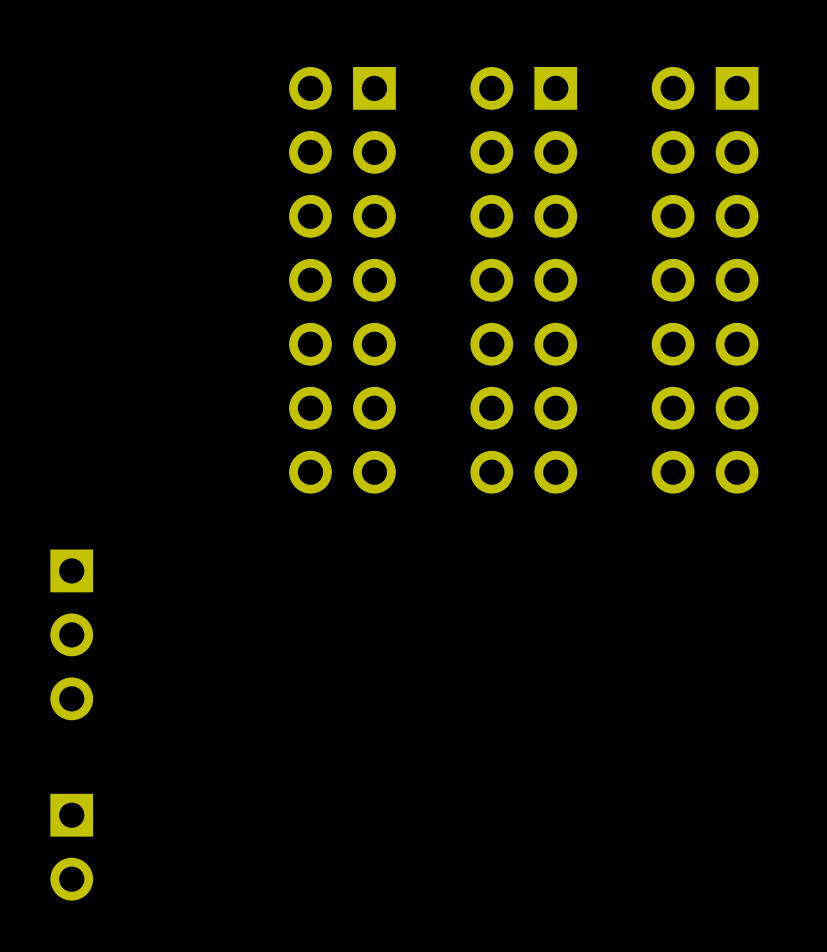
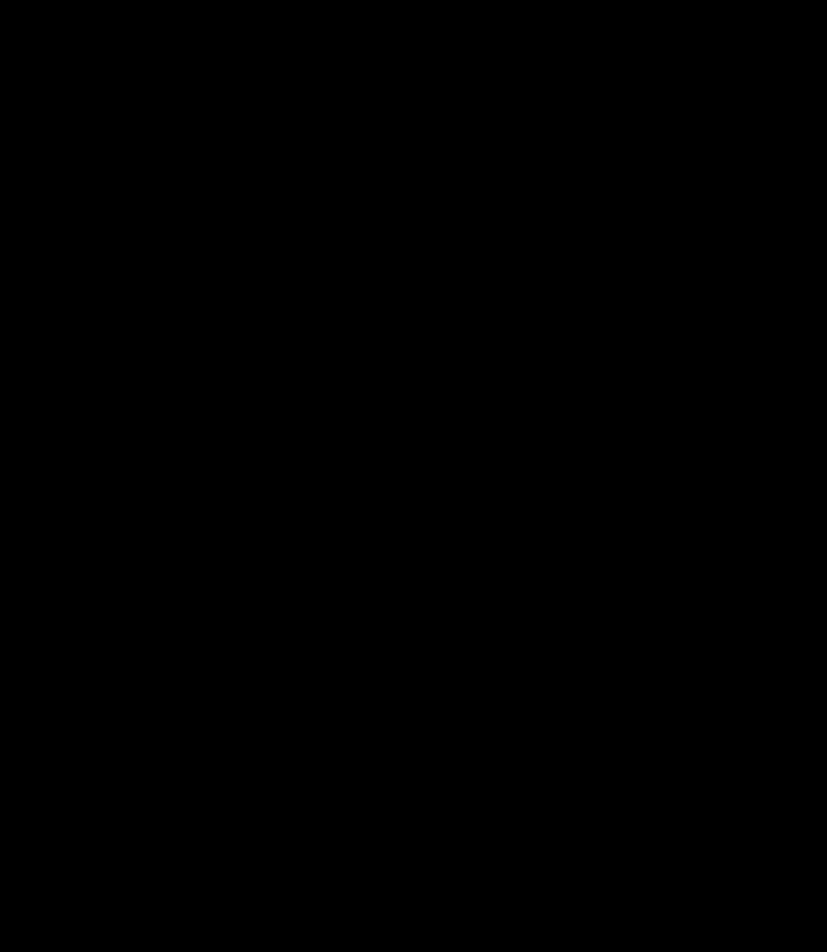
part: (342, 280) -> none
part: (523, 280) -> none
part: (705, 280) -> none
part: (71, 634) -> none
part: (71, 847) -> none

